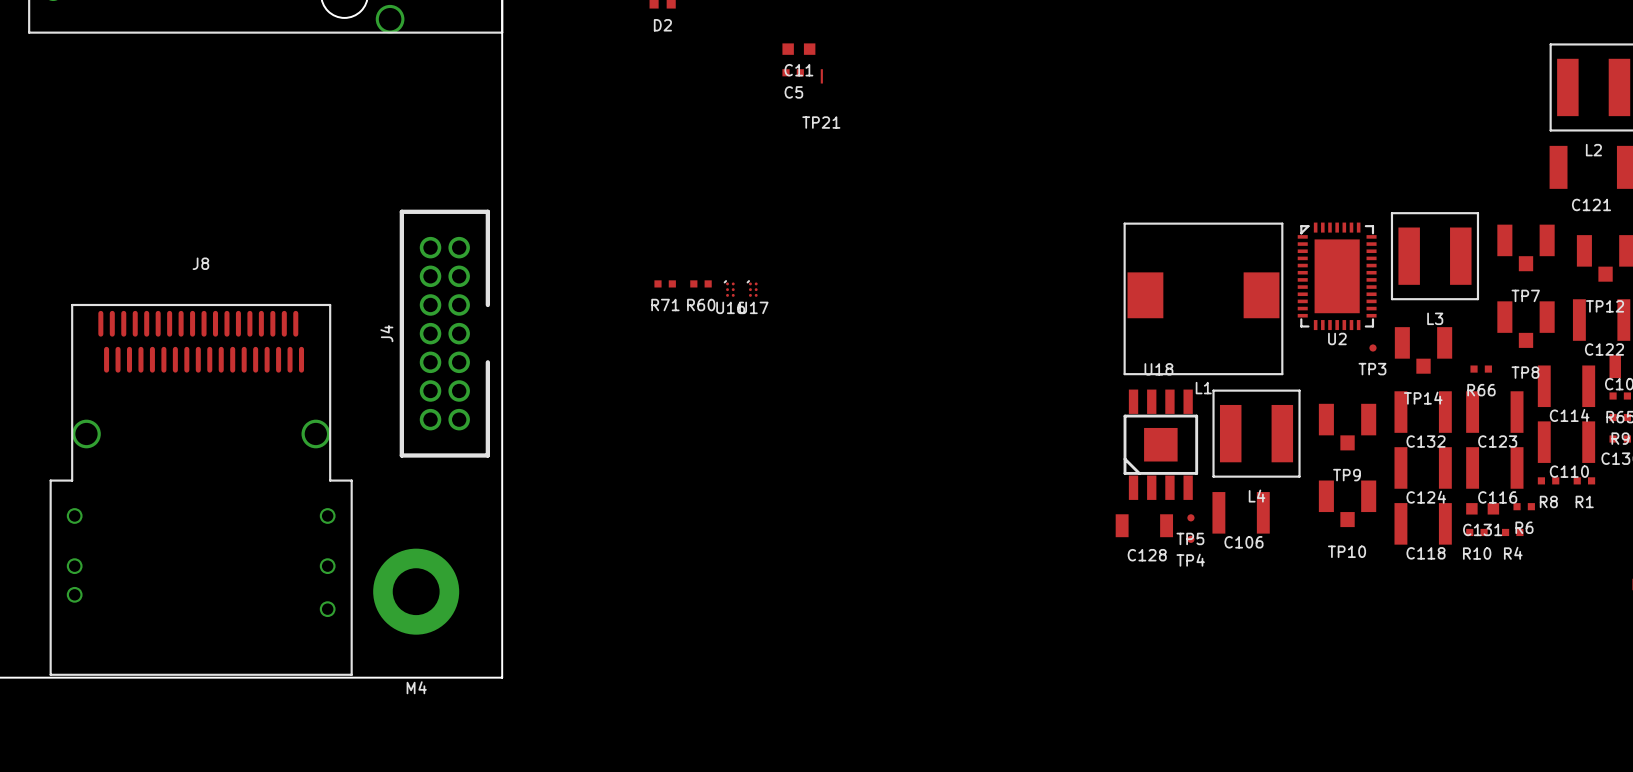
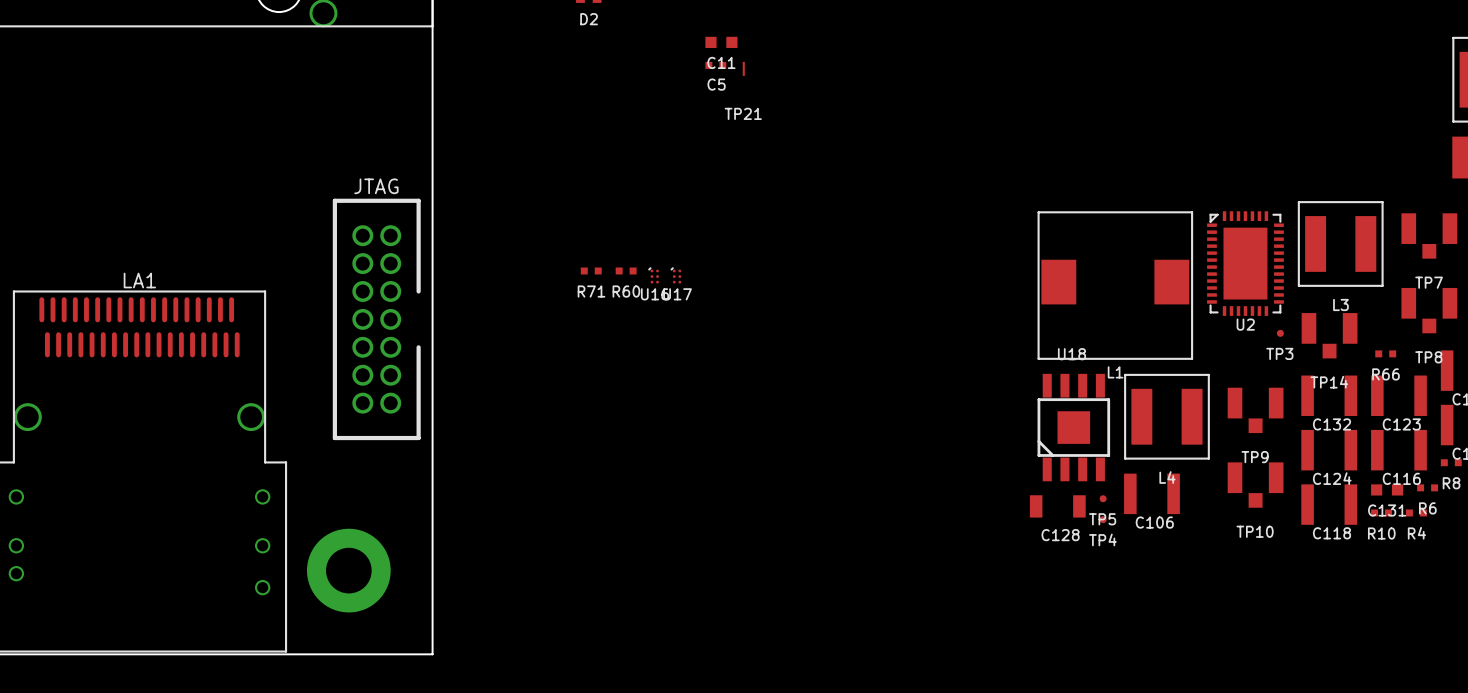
text: none -> JTAG (376, 186)
J8 name: J8 (200, 263) -> none
text: none -> LA1 (139, 280)
J4 name: J4 (386, 333) -> none
M4 name: M4 (416, 687) -> none

